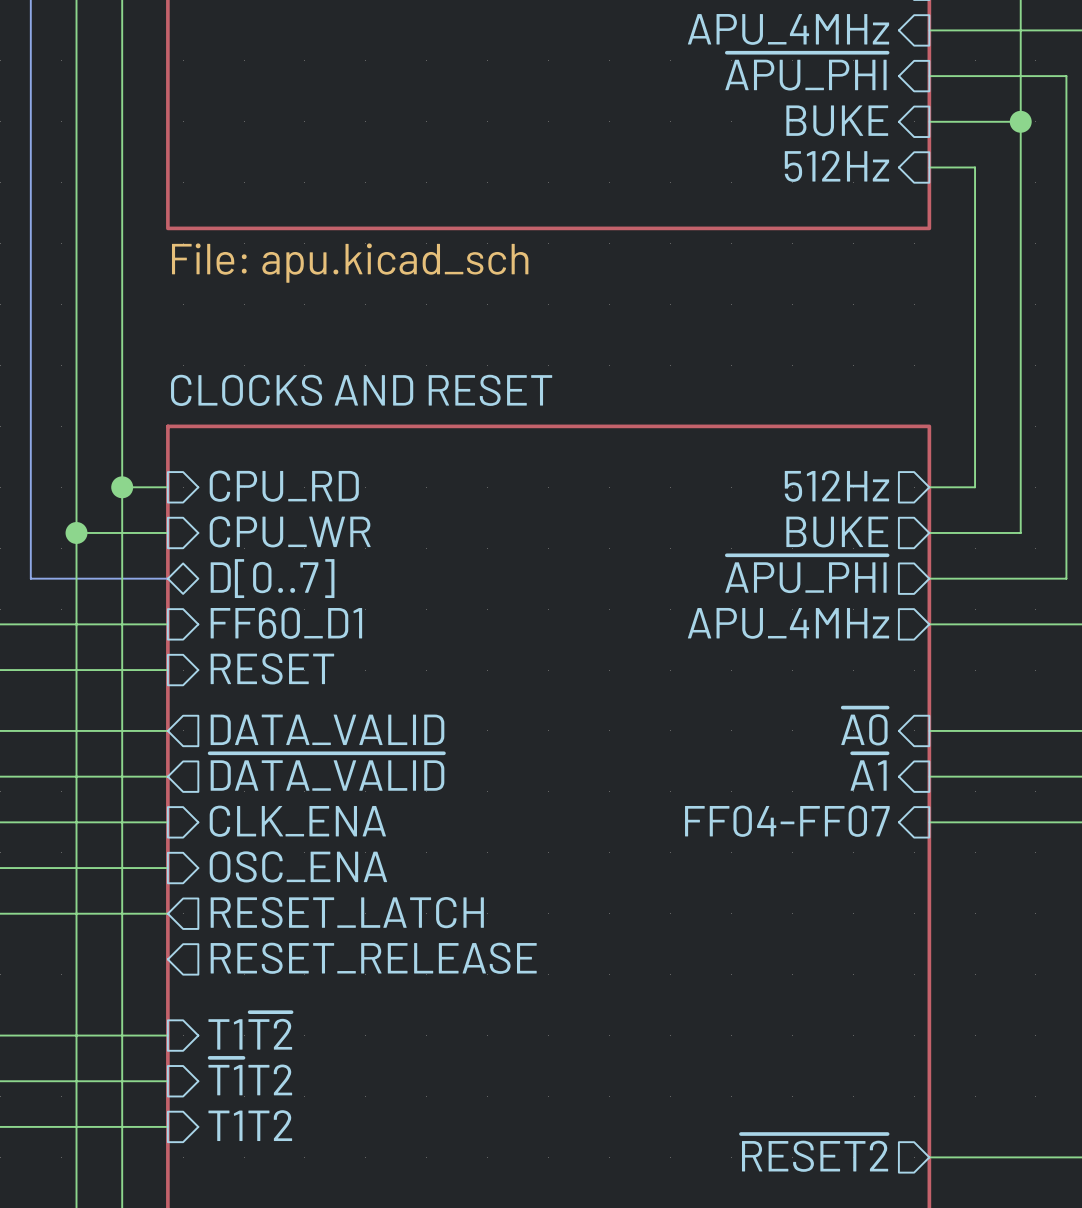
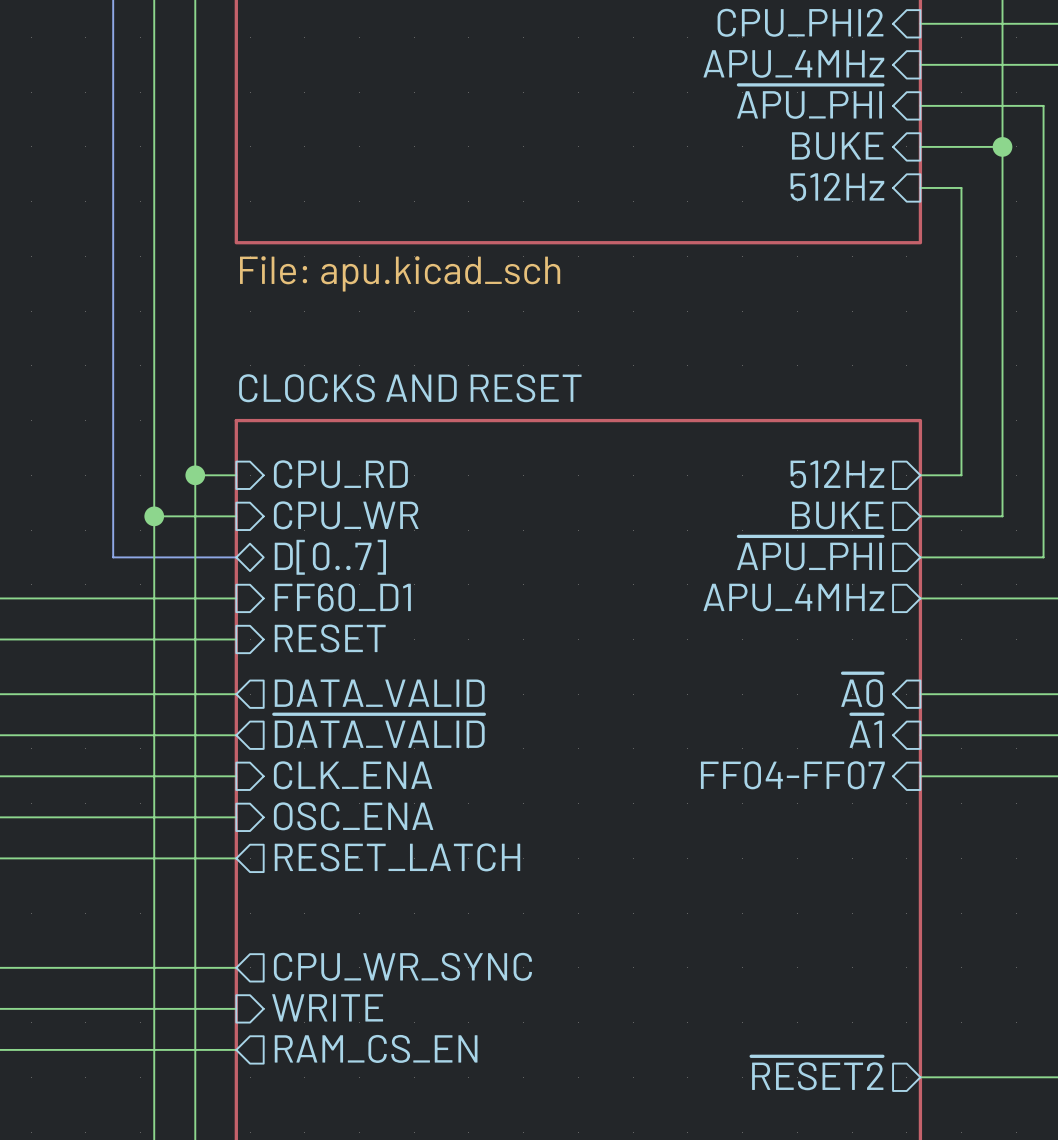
sheet pin: RESET_RELEASE (373, 958) -> none
sheet pin shape: input (250, 1030) -> output (402, 966)
sheet pin: T1~{T2} (250, 1030) -> CPU_WR_SYNC (402, 966)
sheet pin: ~{T1}T2 (250, 1076) -> WRITE (327, 1007)
sheet pin shape: input (250, 1125) -> output (376, 1048)
sheet pin: T1T2 (250, 1125) -> RAM_CS_EN (376, 1048)

